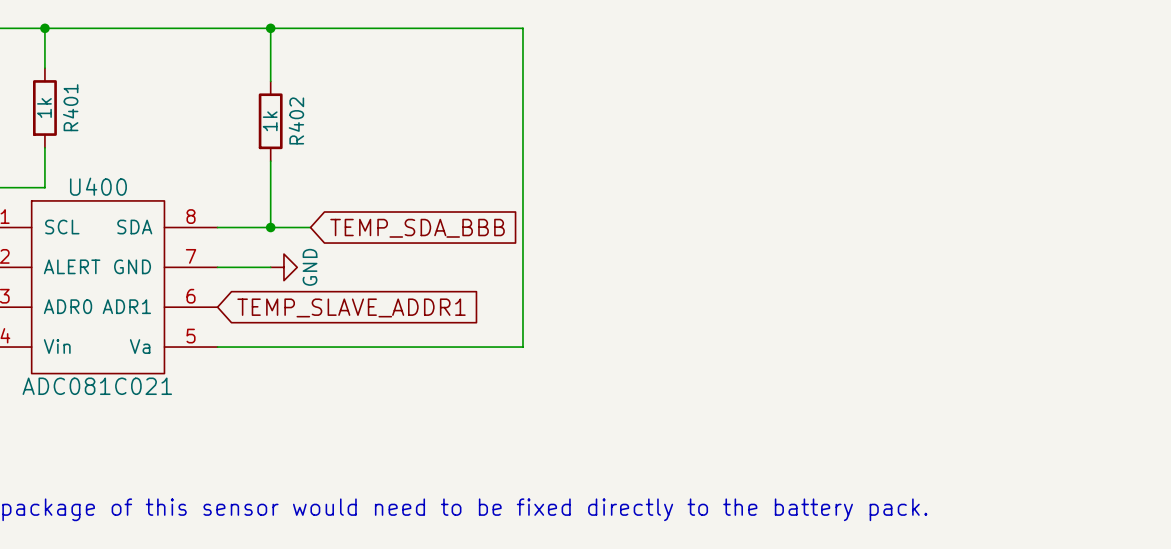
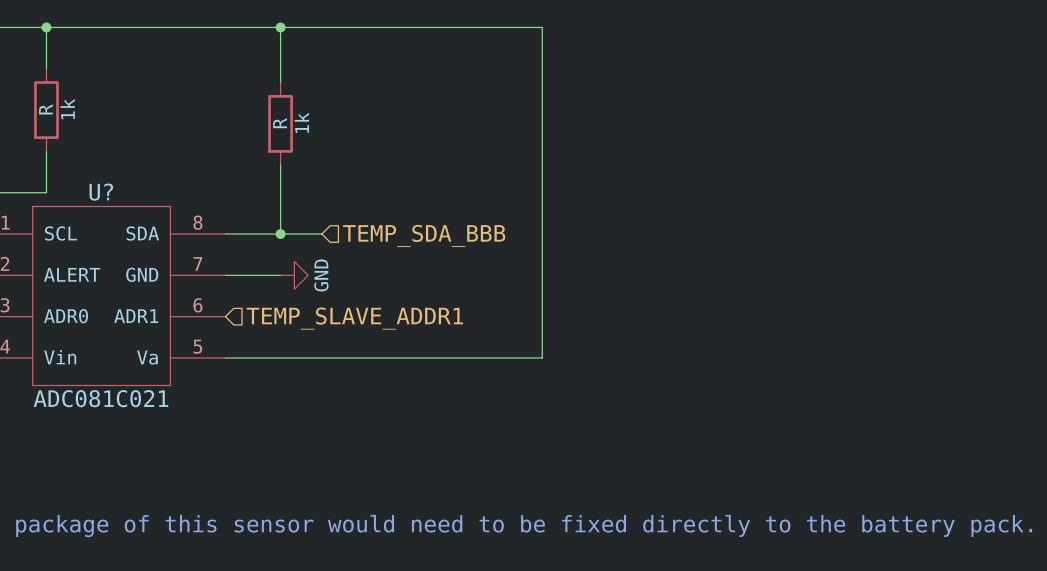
R401 name: R401 (70, 107) -> 1k (67, 109)
R401 value: 1k (44, 108) -> R (45, 109)
R402 name: R402 (296, 120) -> 1k (301, 122)
R402 value: 1k (270, 121) -> R (280, 123)
U400 name: U400 (98, 186) -> U? (101, 192)
hierarchical label: none -> TEMP_SDA_BBB (424, 235)
global label: TEMP_SDA_BBB (417, 228) -> none
global label: TEMP_SLAVE_ADDR1 (351, 307) -> none
hierarchical label: none -> TEMP_SLAVE_ADDR1 (354, 318)

